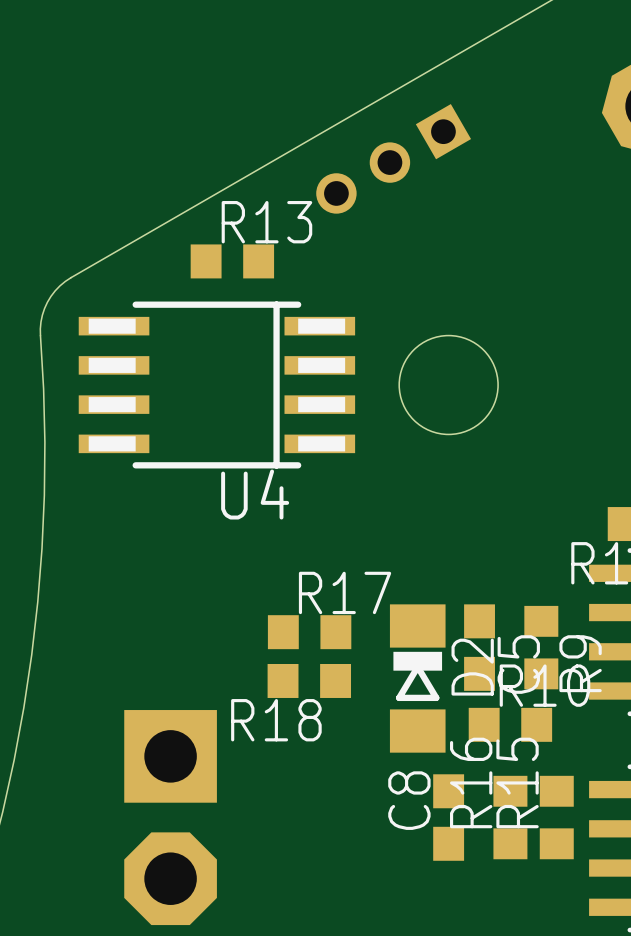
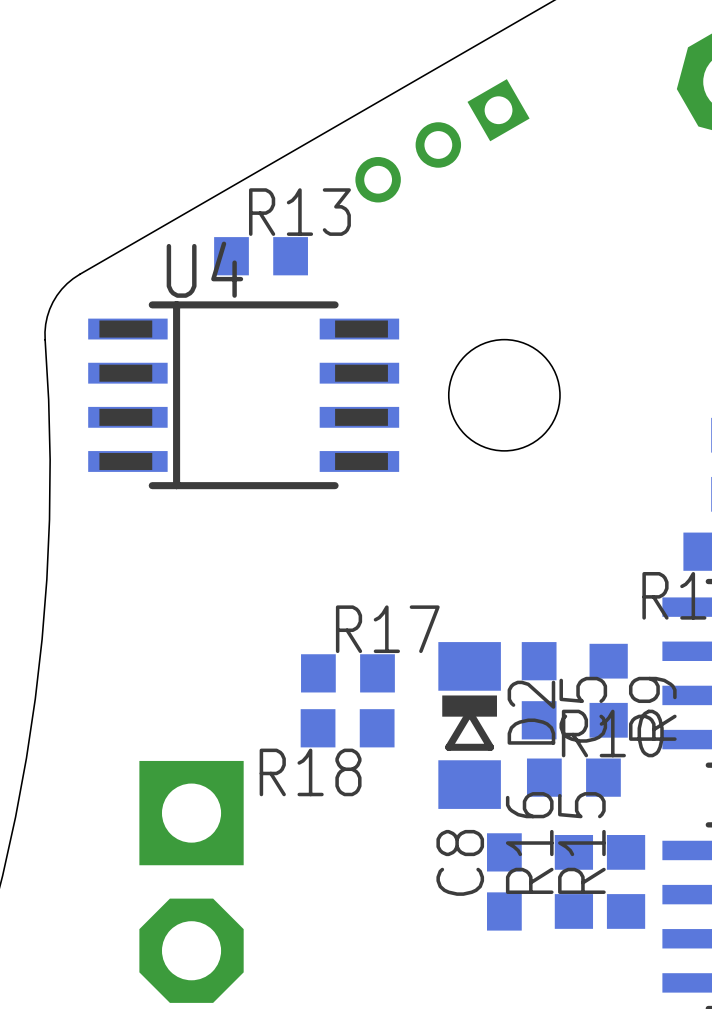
U4 rotation: 0° (216, 385) -> 180° (243, 395)

